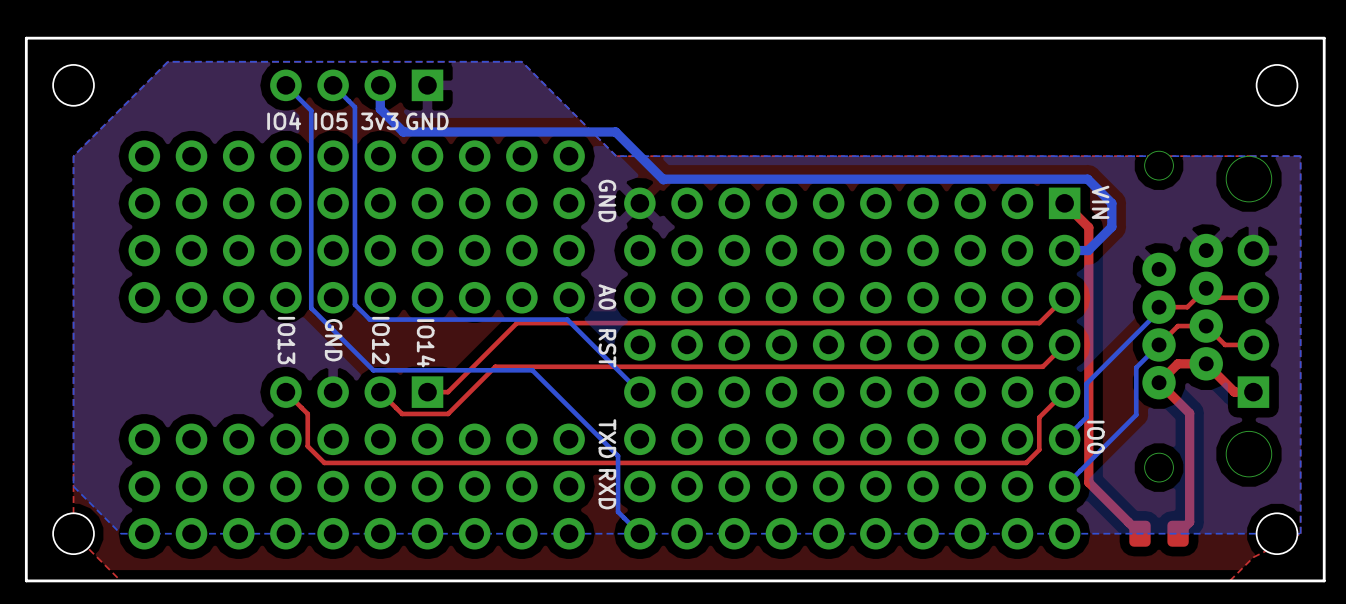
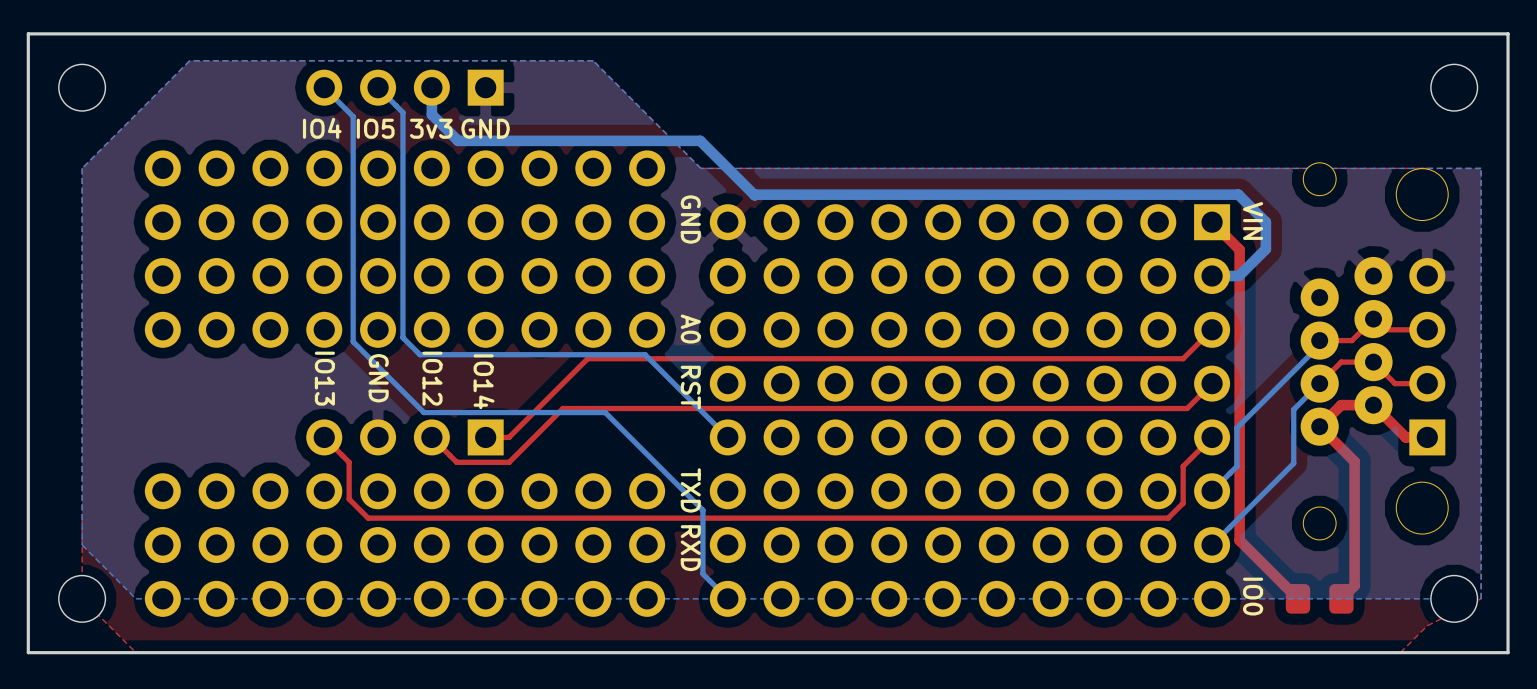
text position: IO0 (1095, 437) -> IO0 (1253, 596)

